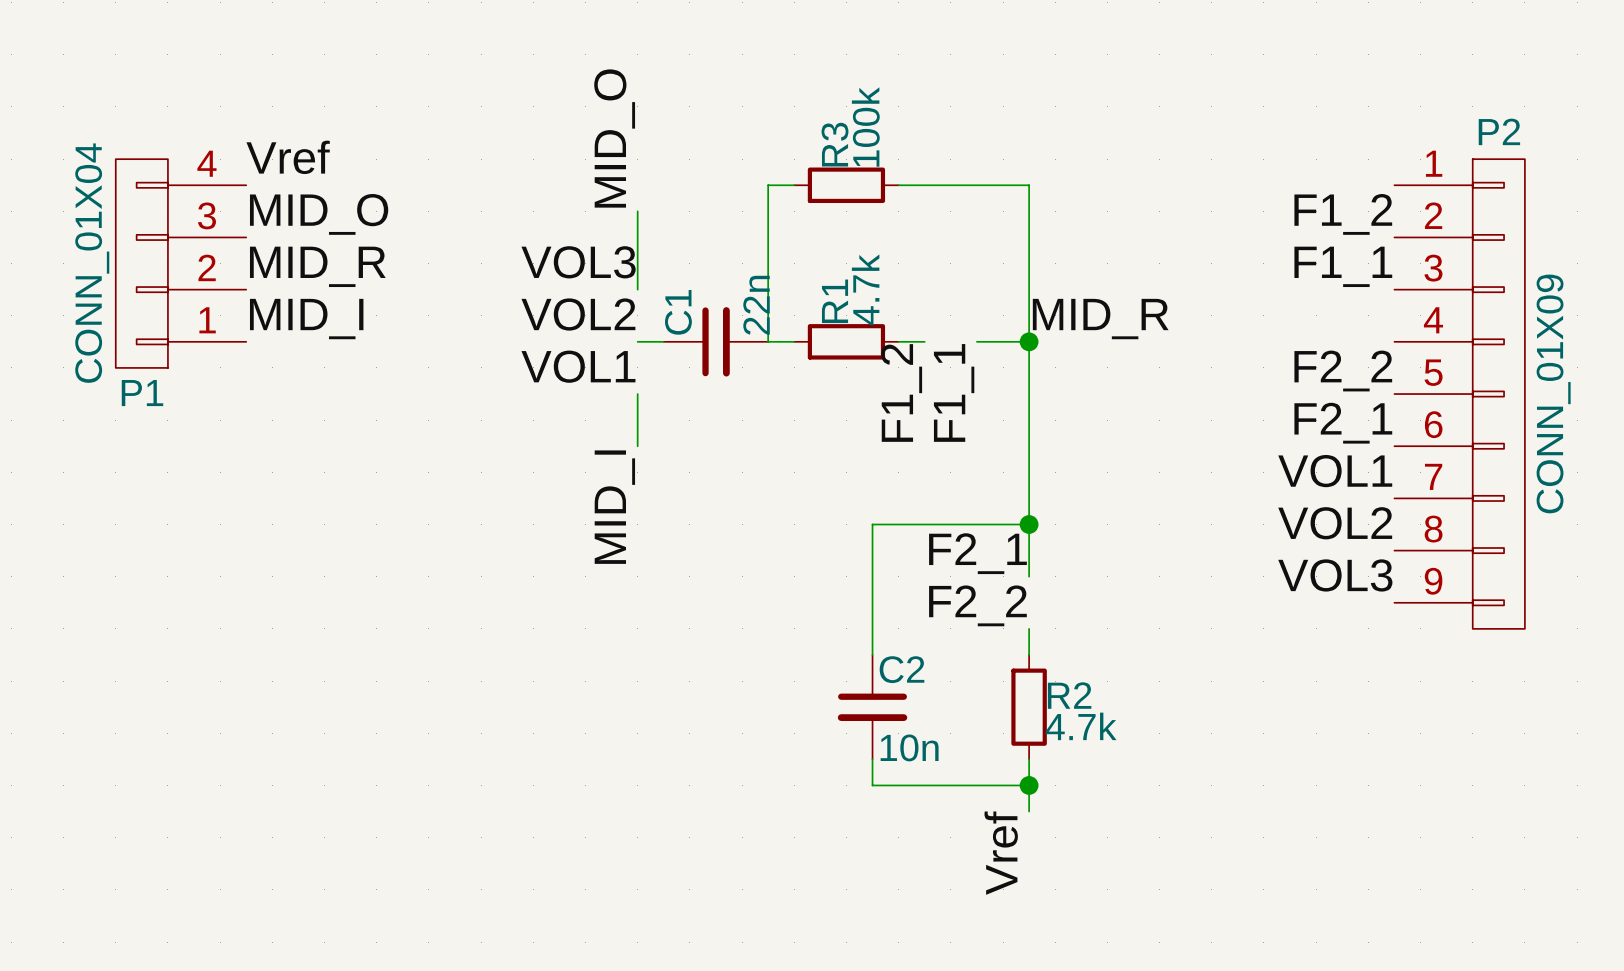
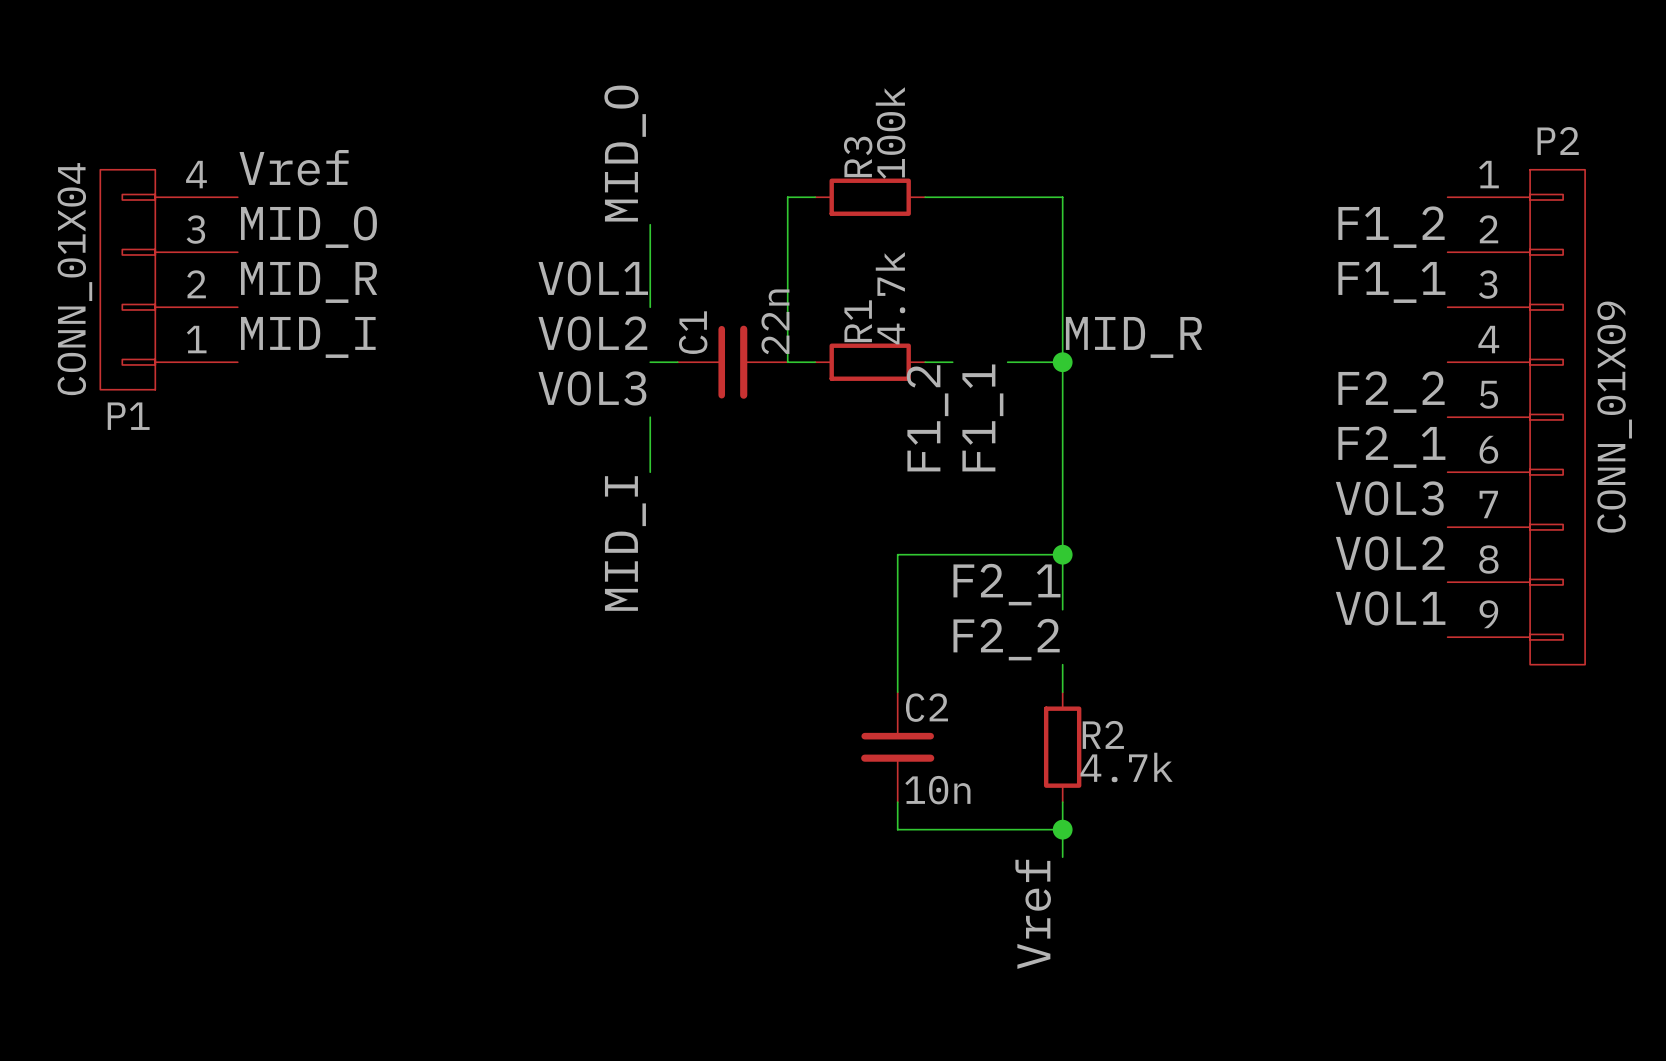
label: VOL3 (578, 262) -> VOL1 (593, 278)
label: VOL1 (578, 366) -> VOL3 (592, 388)
label: VOL1 (1335, 471) -> VOL3 (1389, 498)
label: VOL3 (1335, 575) -> VOL1 (1390, 608)

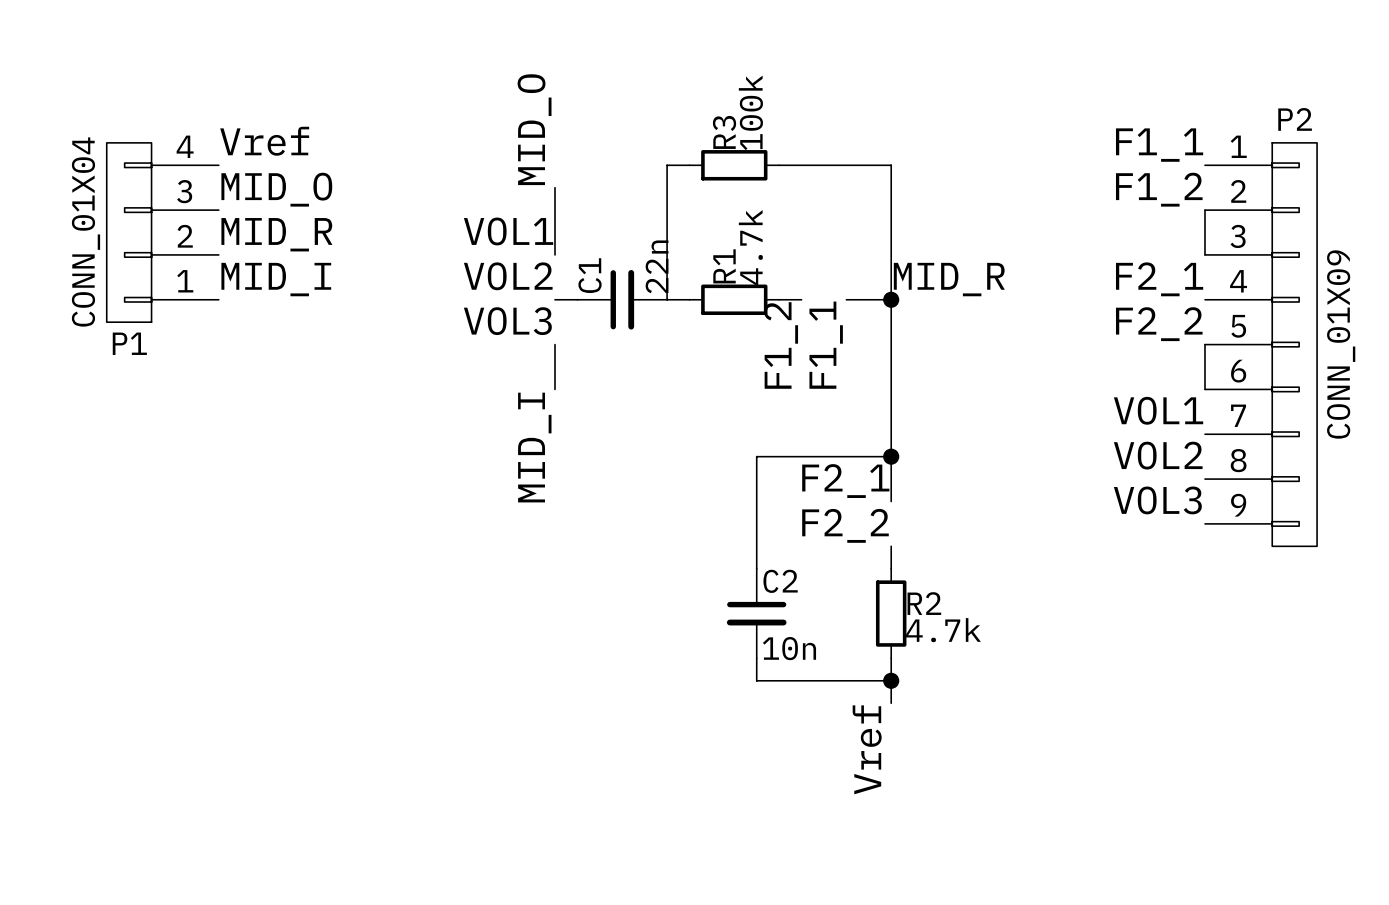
wire: none -> (1204, 210) (1204, 254)
label position: F1_1 (1391, 282) -> F1_1 (1159, 145)
wire: none -> (1204, 344) (1204, 389)
label position: F2_1 (1391, 447) -> F2_1 (1159, 279)
label: VOL3 (1389, 498) -> VOL1 (1158, 410)
label: VOL1 (1390, 608) -> VOL3 (1157, 500)

